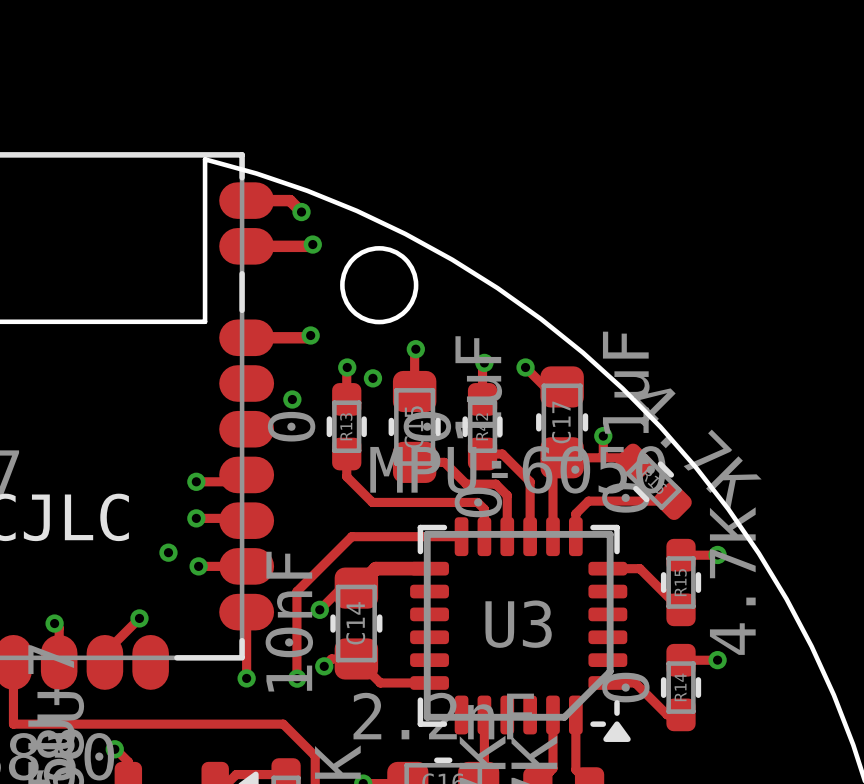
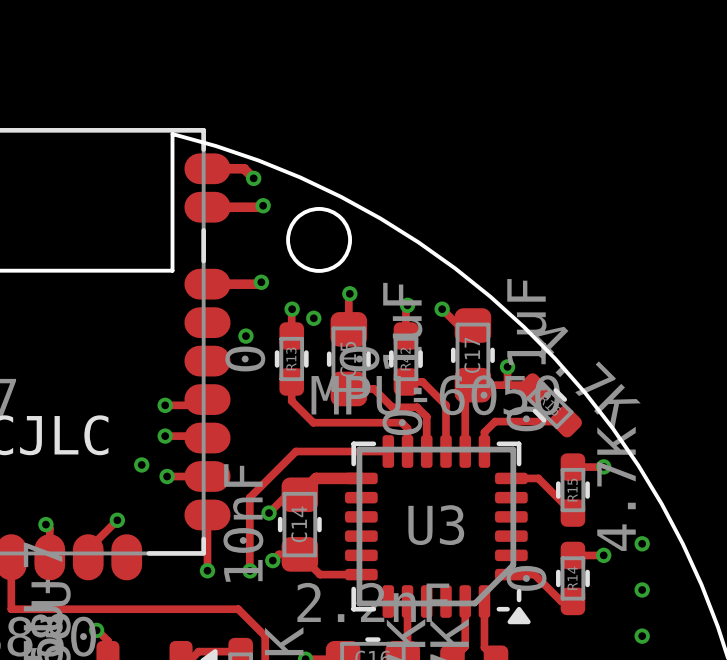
via: none -> (642, 543)
via: none -> (642, 589)
via: none -> (642, 636)

